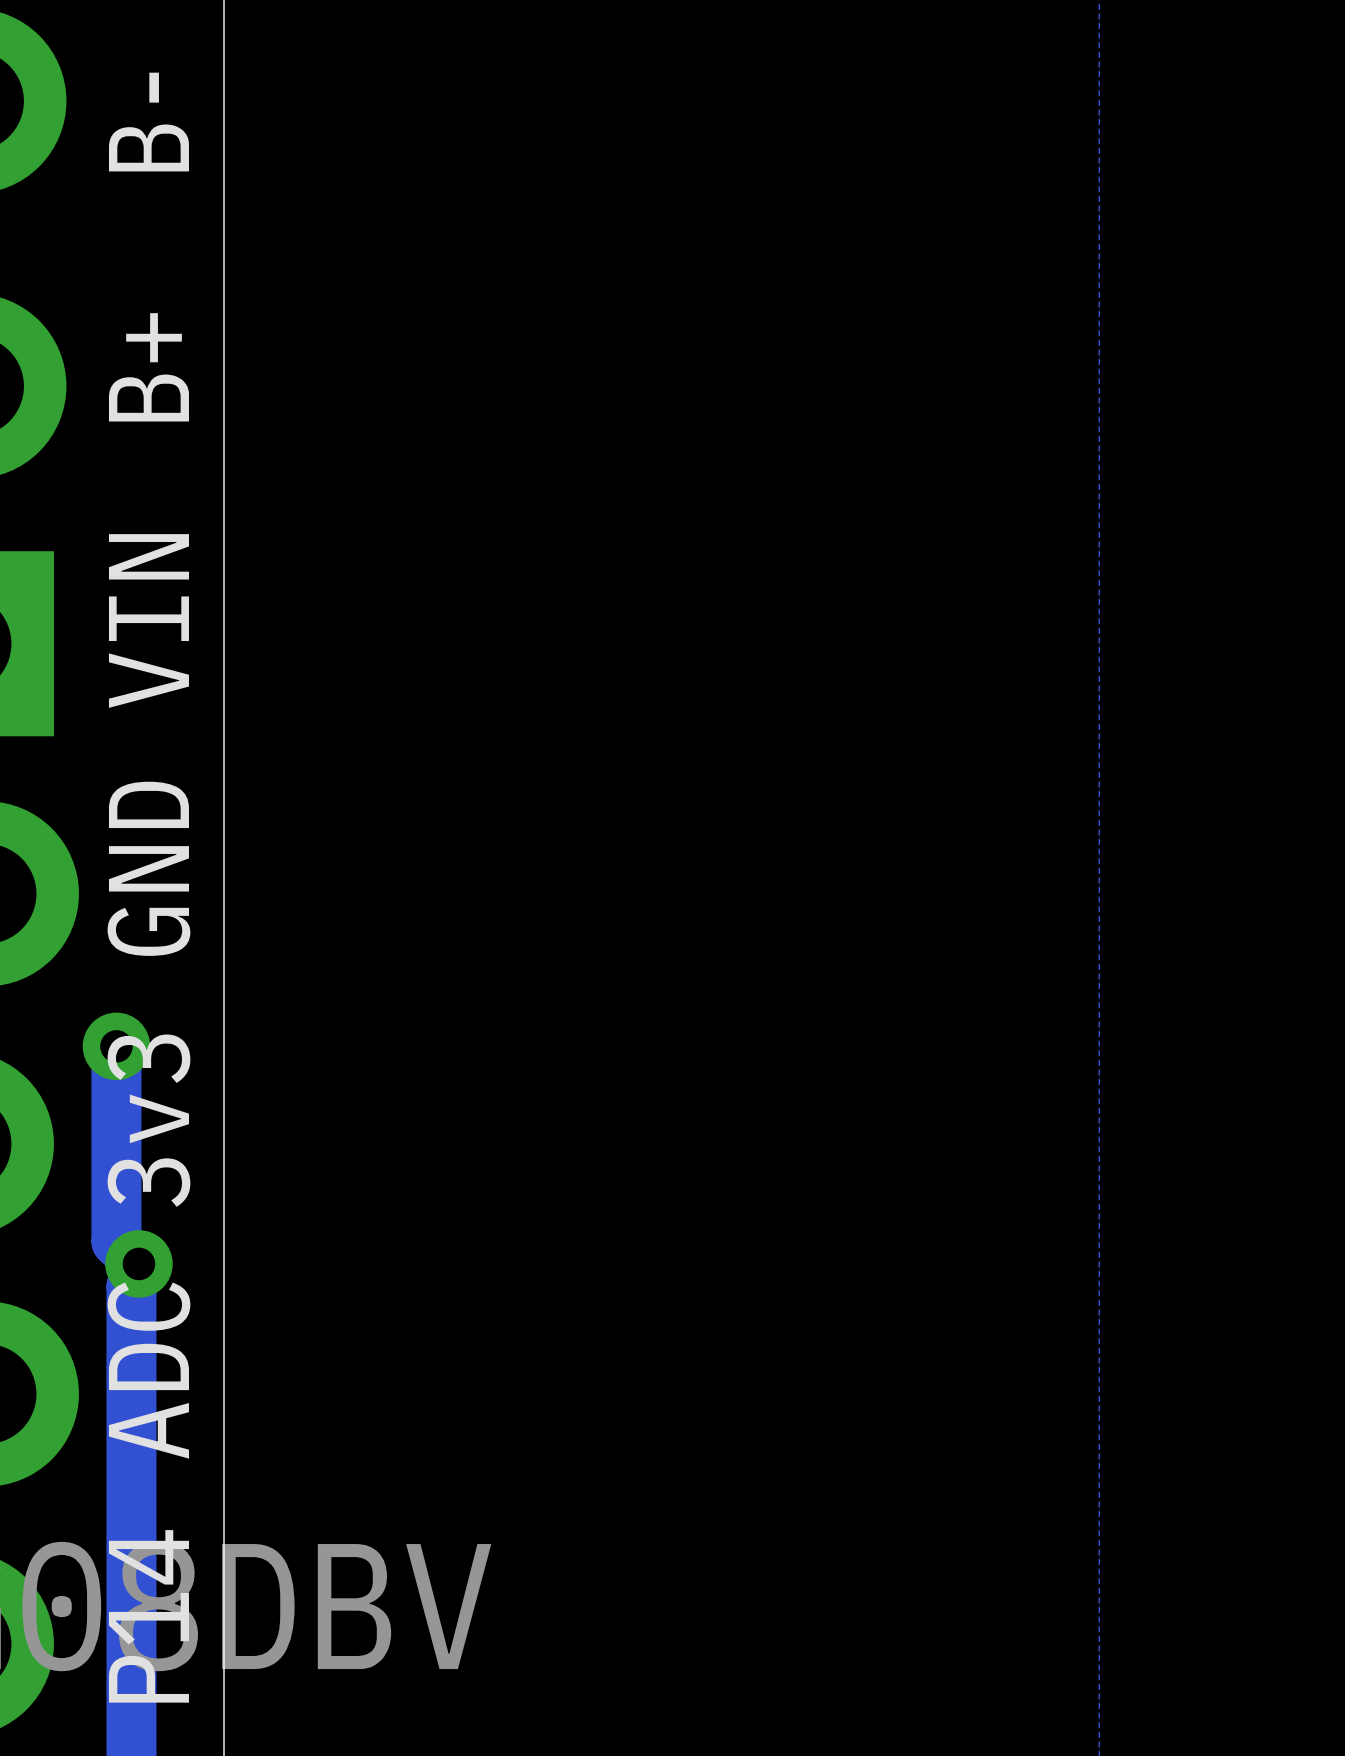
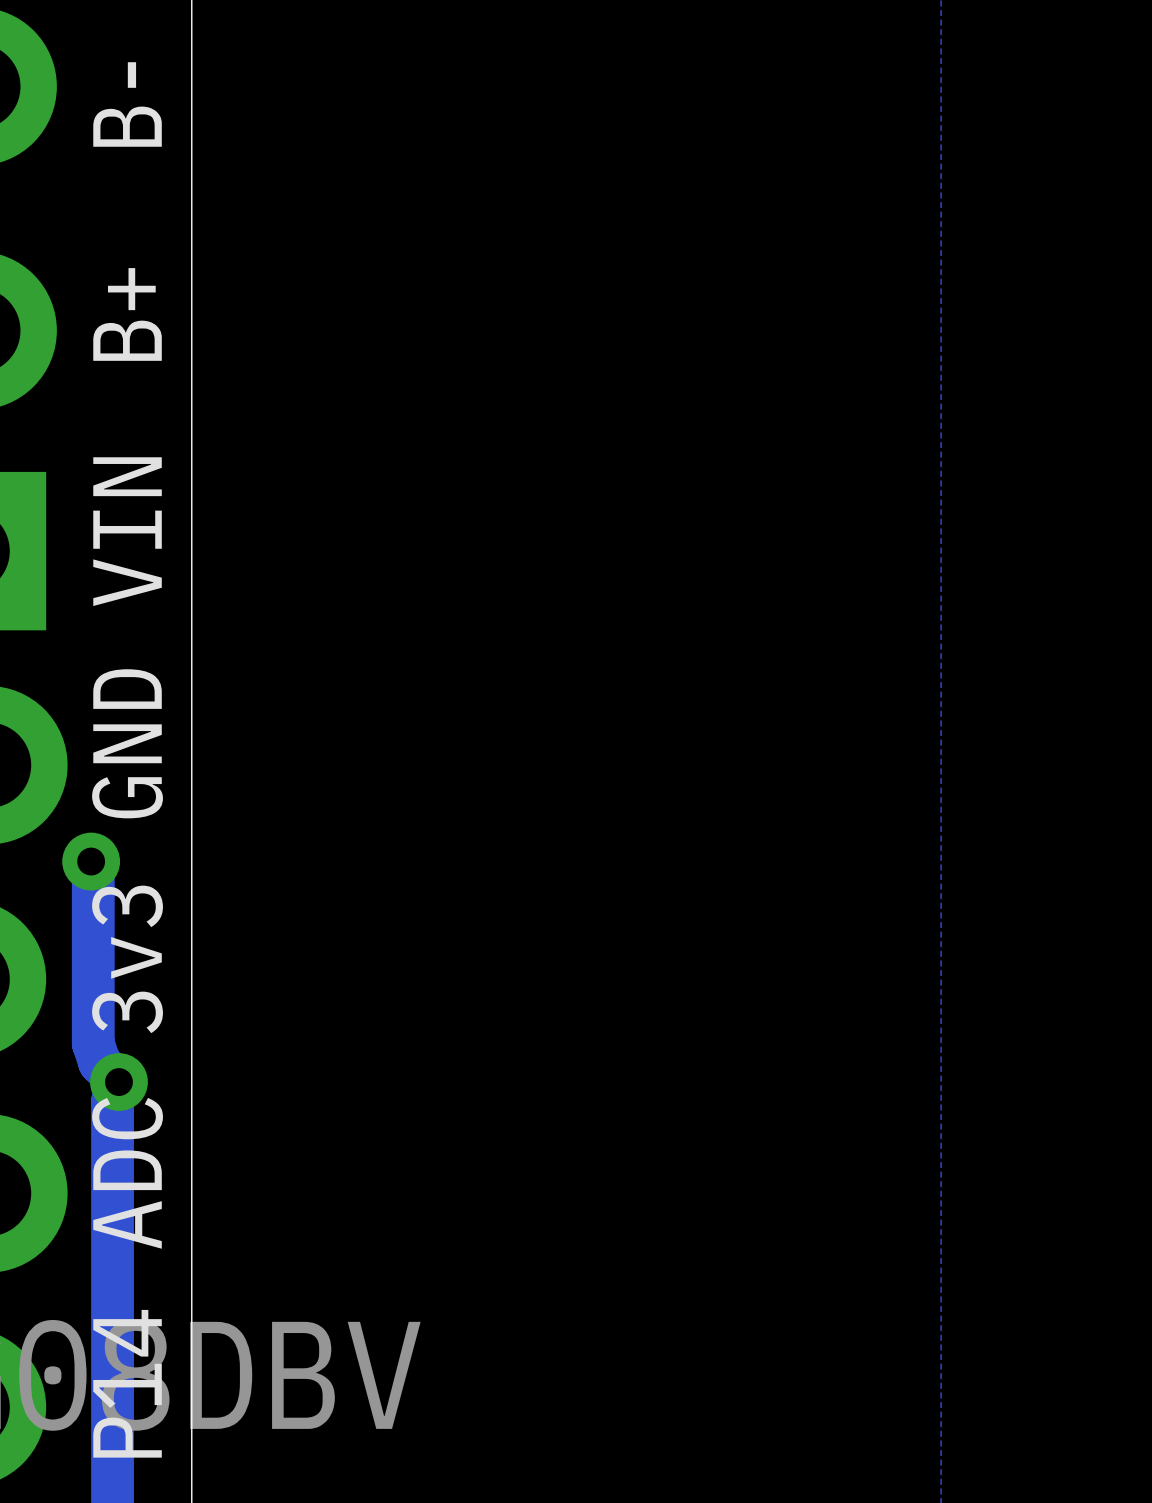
track: (116, 1046) (116, 1241) -> (91, 861) (93, 863) (93, 1043) (99, 1062)
via position: (116, 1046) -> (91, 861)

